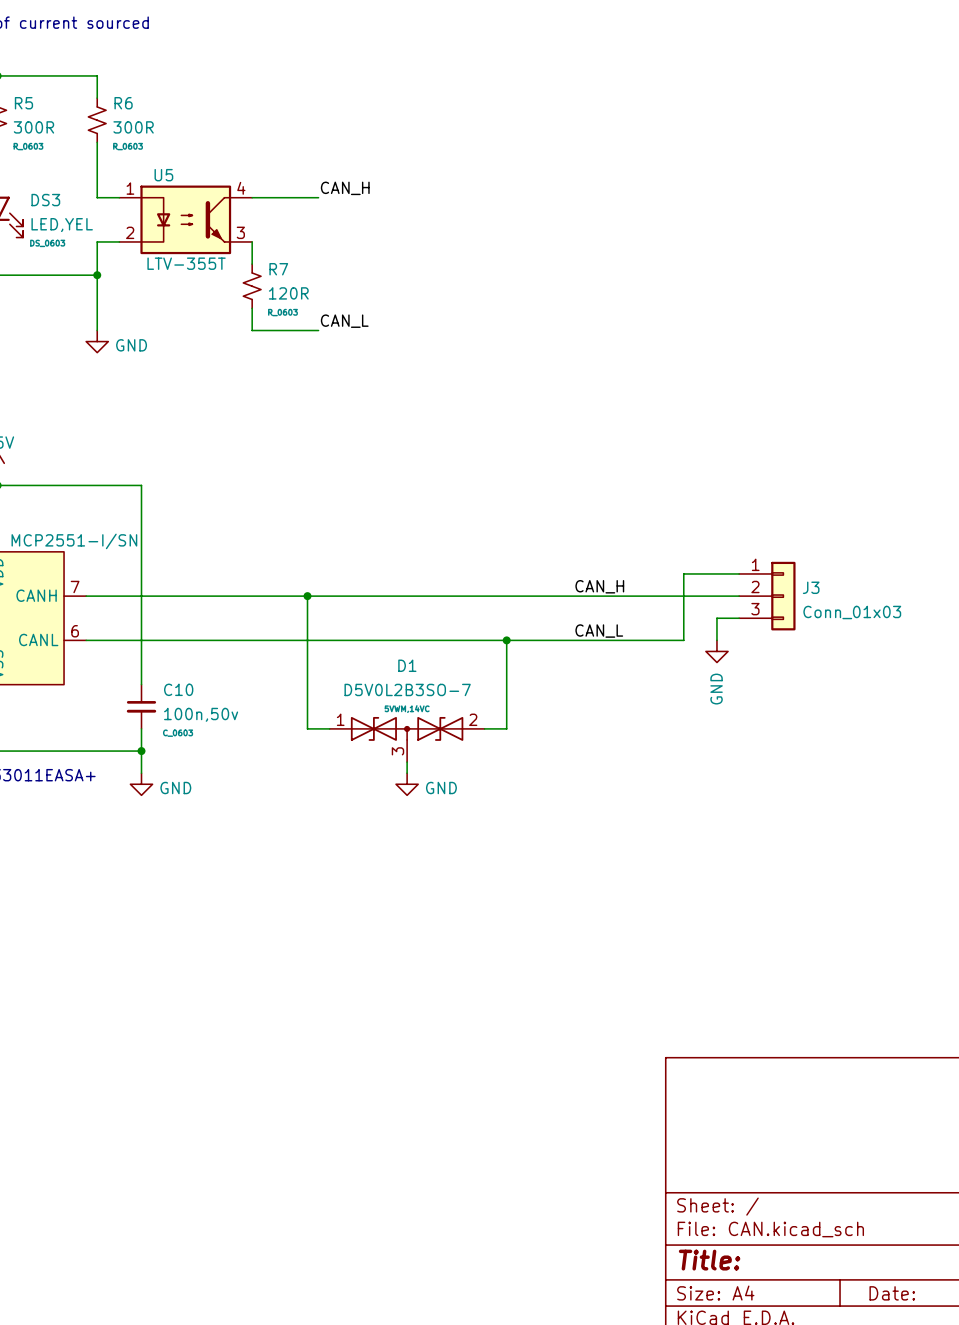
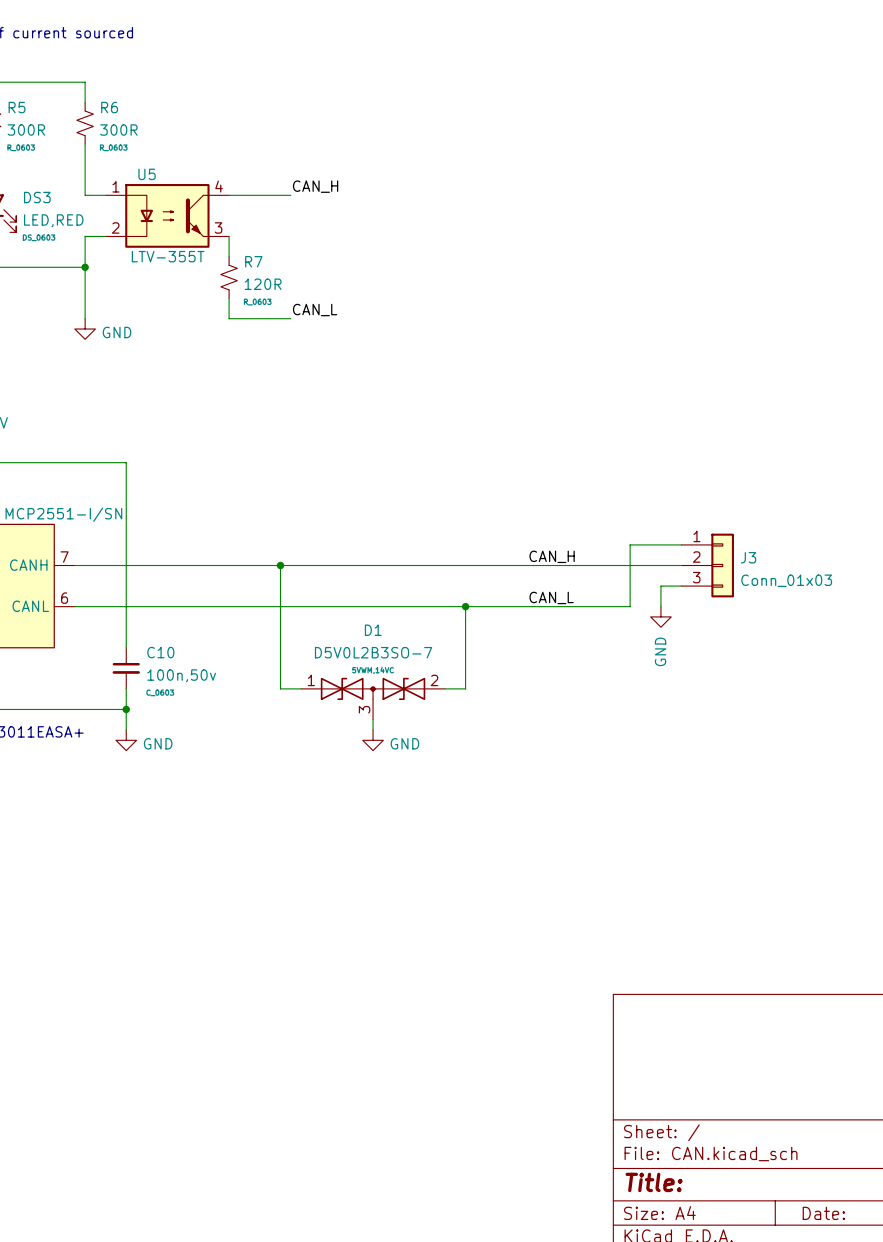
DS3 value: LED,YEL (62, 225) -> LED,RED (53, 220)

